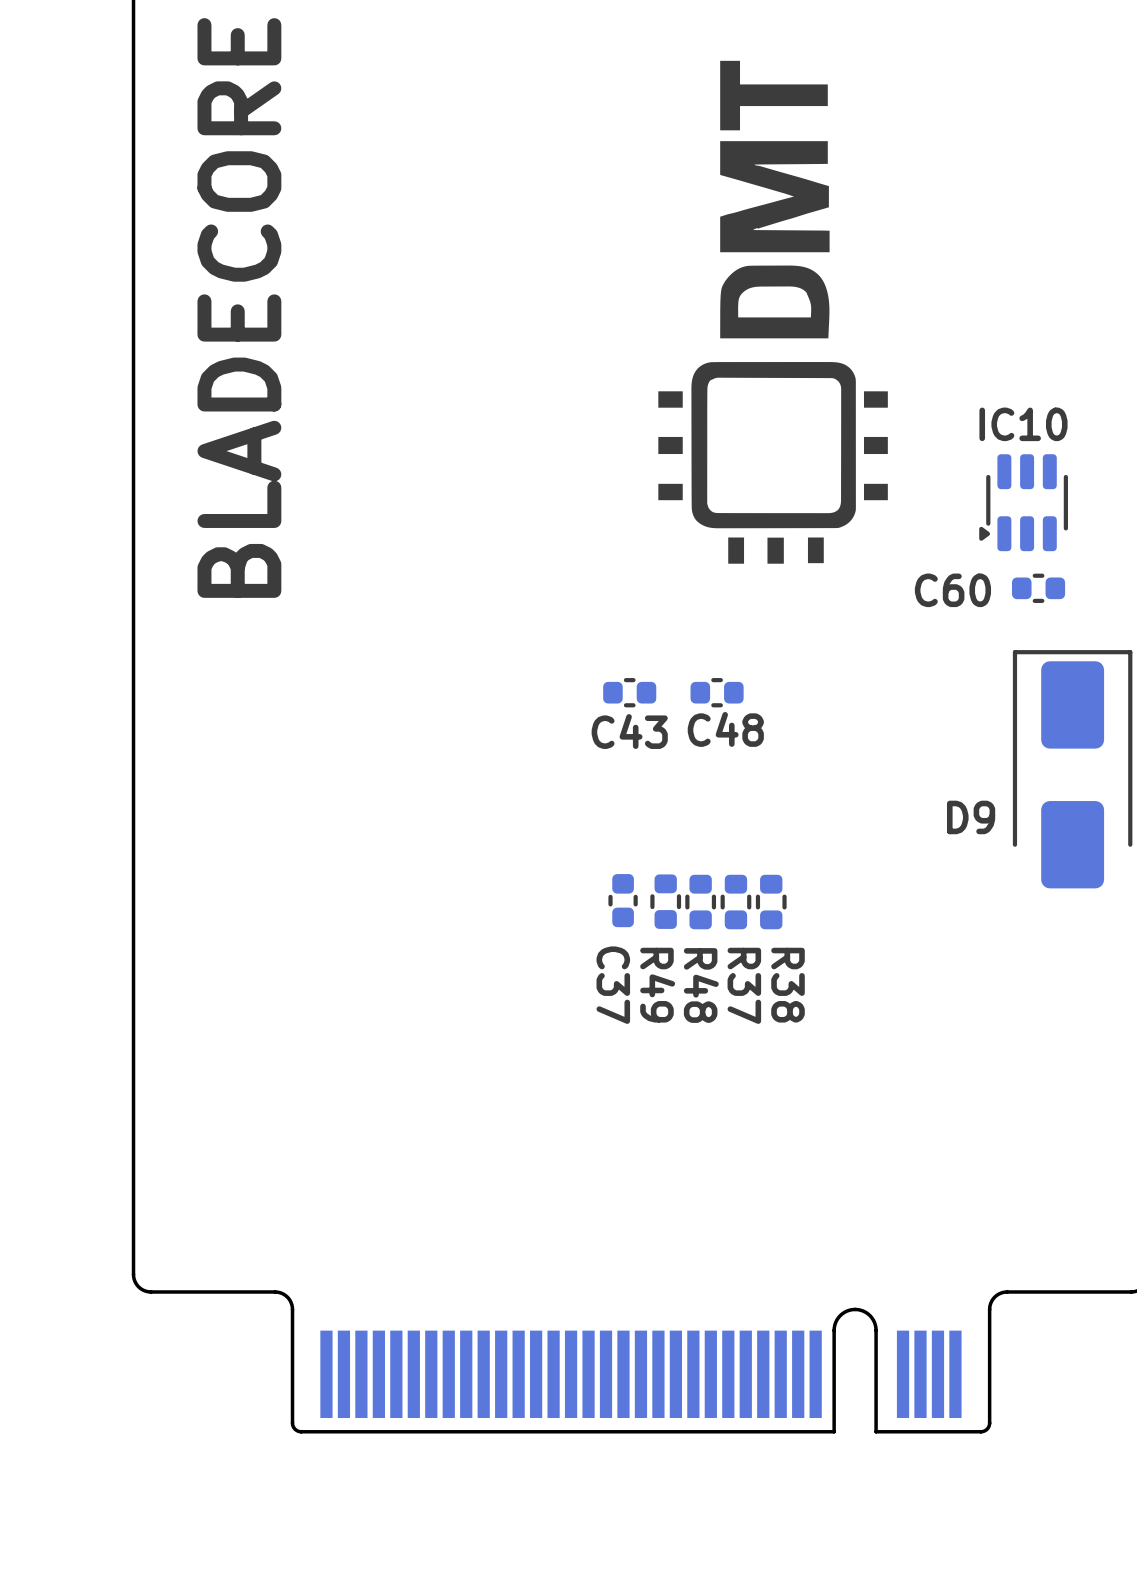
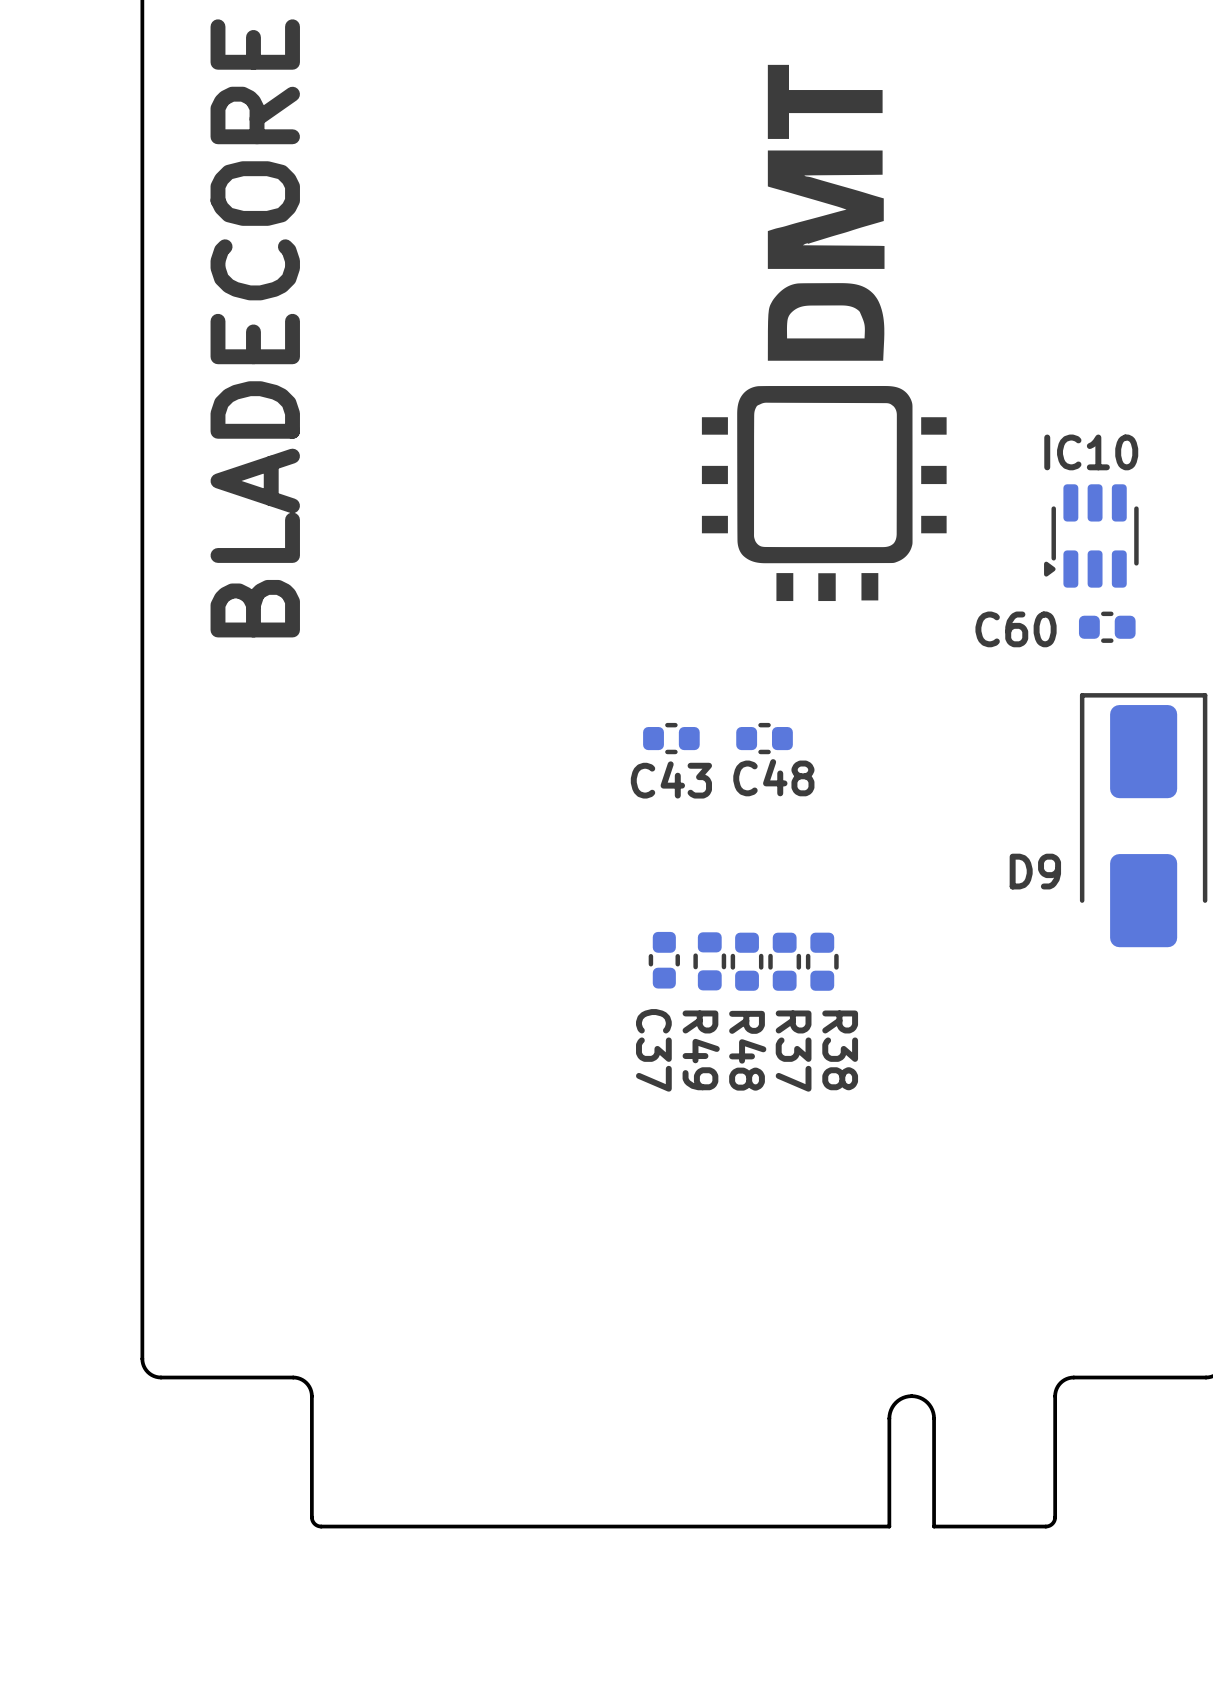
part: (640, 1374) -> none

